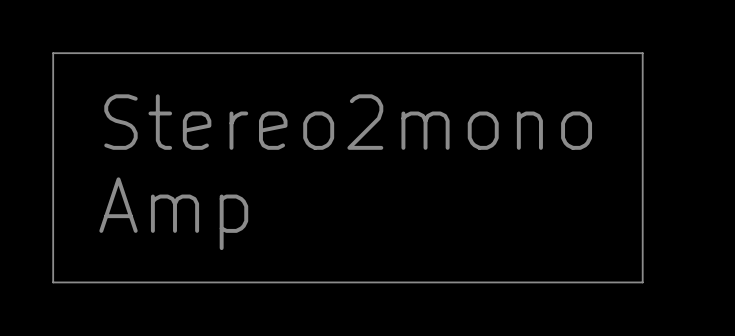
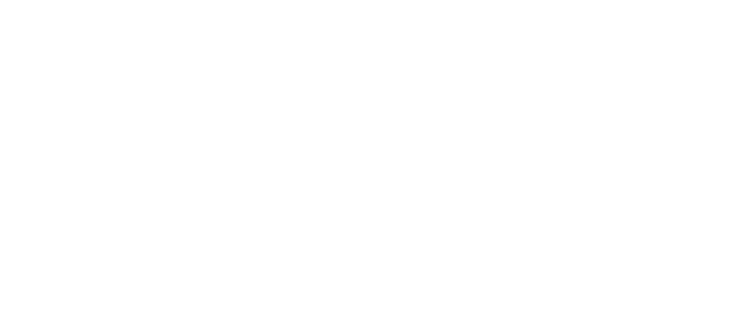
line: (53, 53) (642, 53) (642, 282) (53, 282) (53, 53) -> none
text: Stereo2mono (348, 122) -> none
text: Amp (173, 213) -> none

